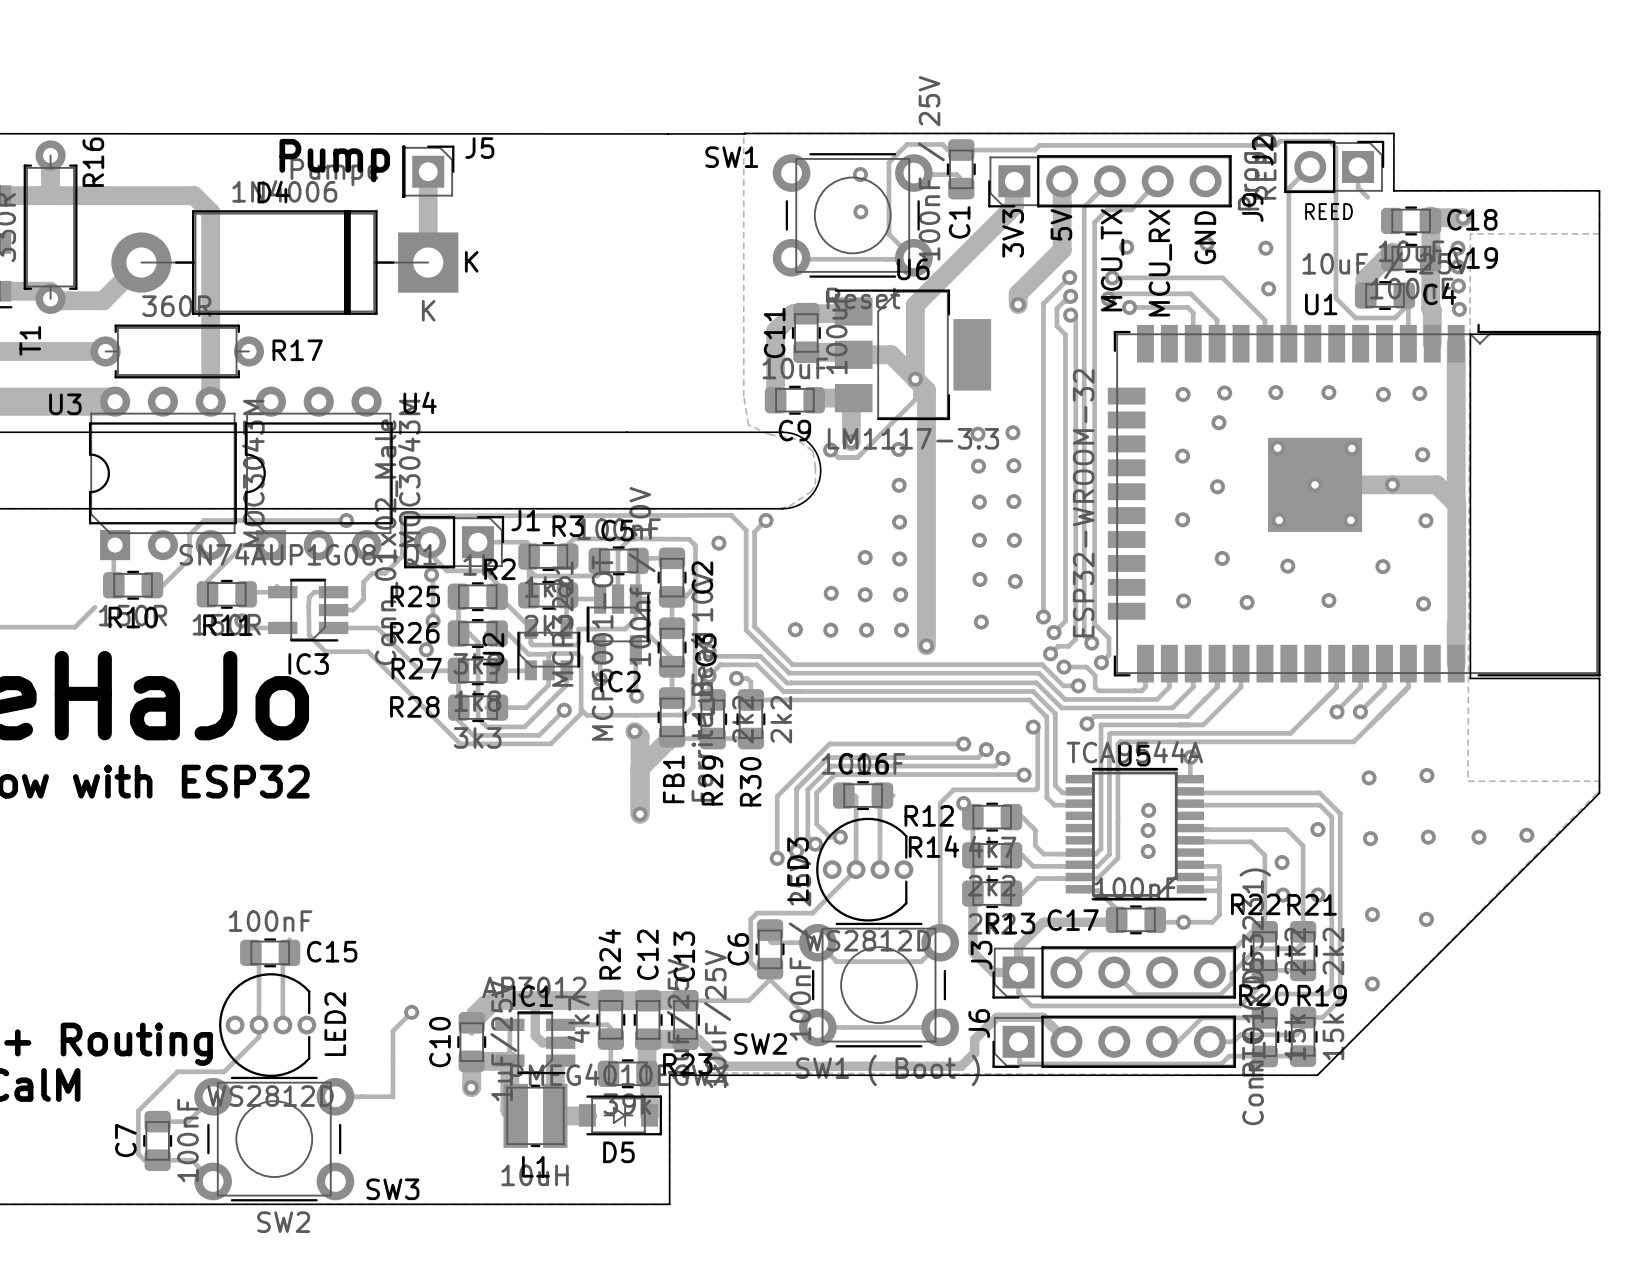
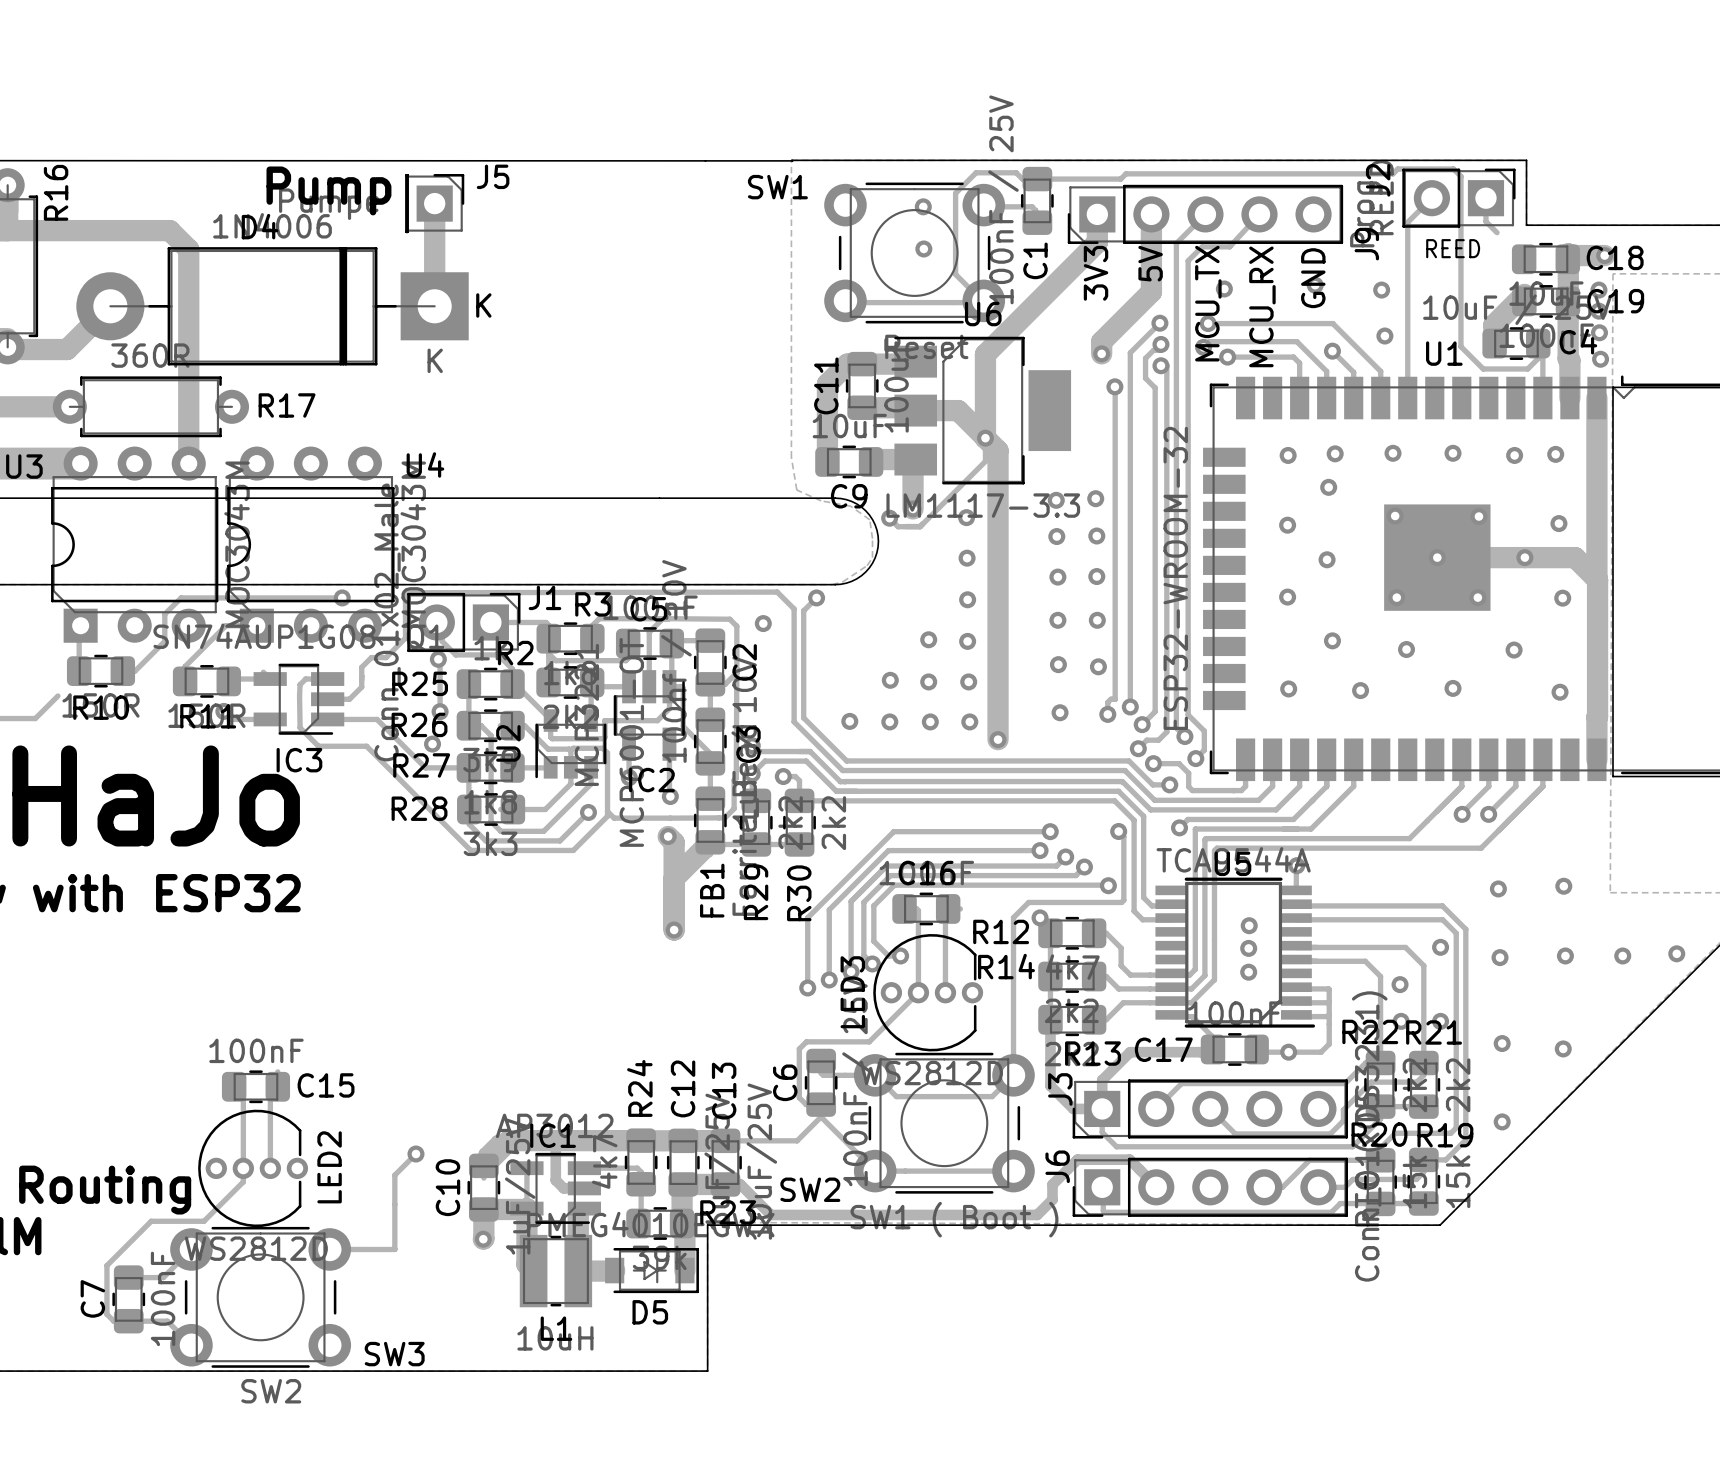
track: none -> (1332, 351) (1353, 372) (1353, 398)
via: none -> (1332, 351)
via: none -> (1114, 386)
track: none -> (1115, 386) (1115, 699)
track: none -> (1115, 699) (1110, 699) (1107, 702) (1107, 714)
via: none -> (1107, 714)
track: none -> (1050, 831) (893, 831) (807, 917) (807, 987)
via: none -> (1050, 831)
via: none -> (807, 987)

